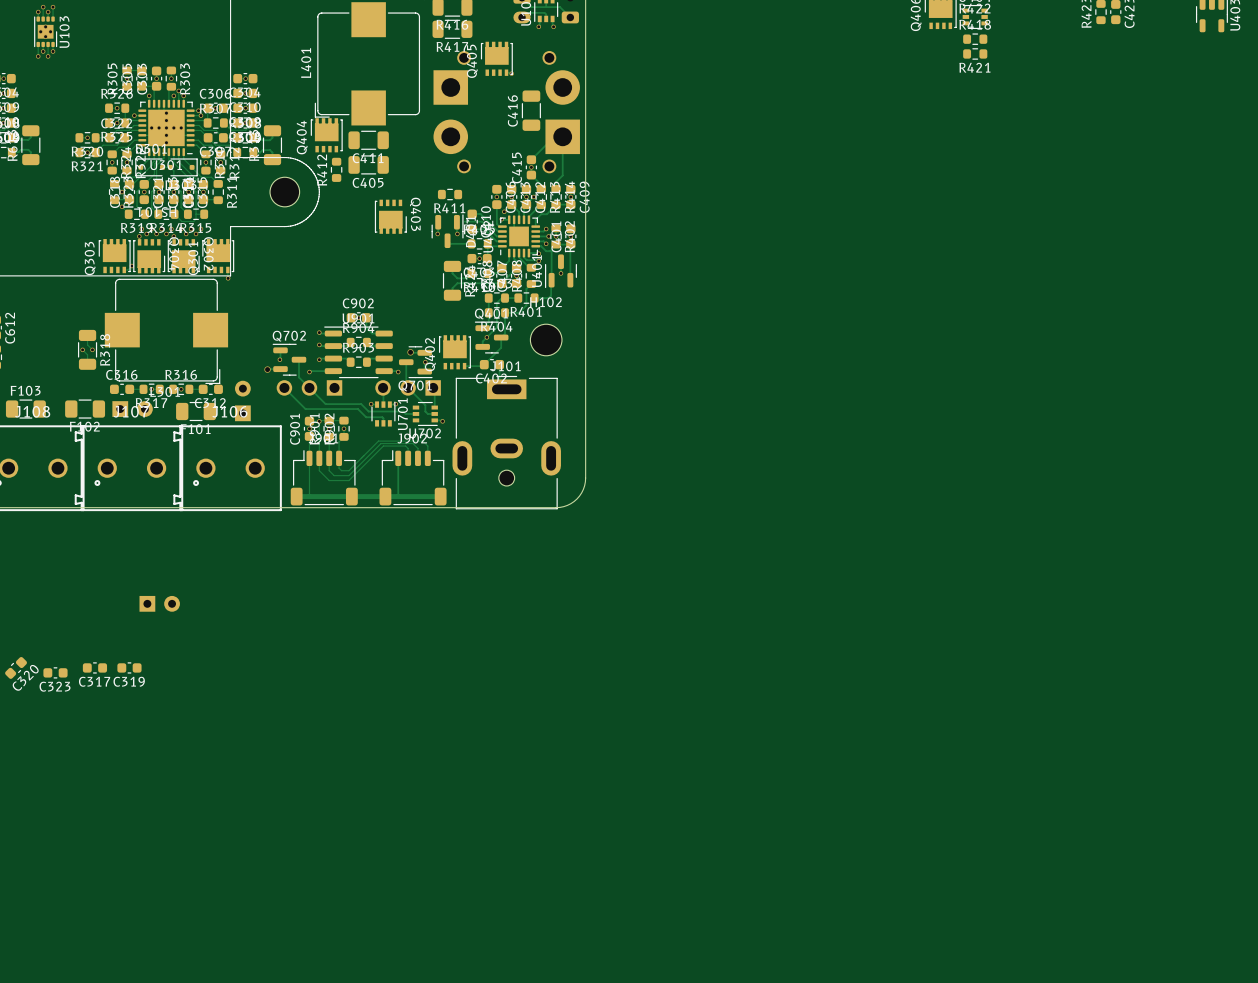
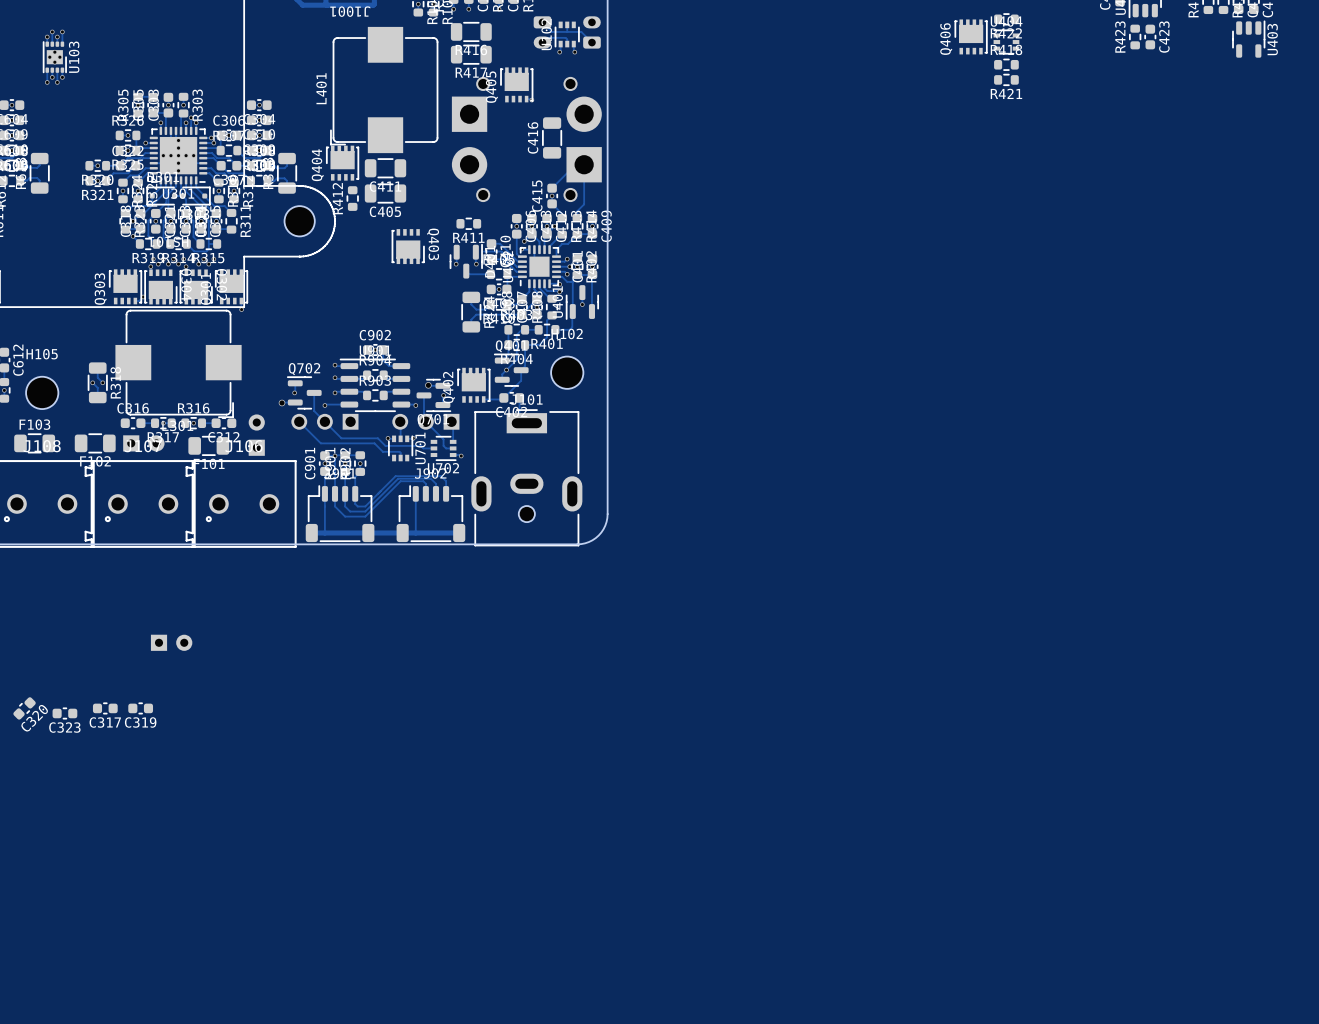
H105: none -> (42, 392)

